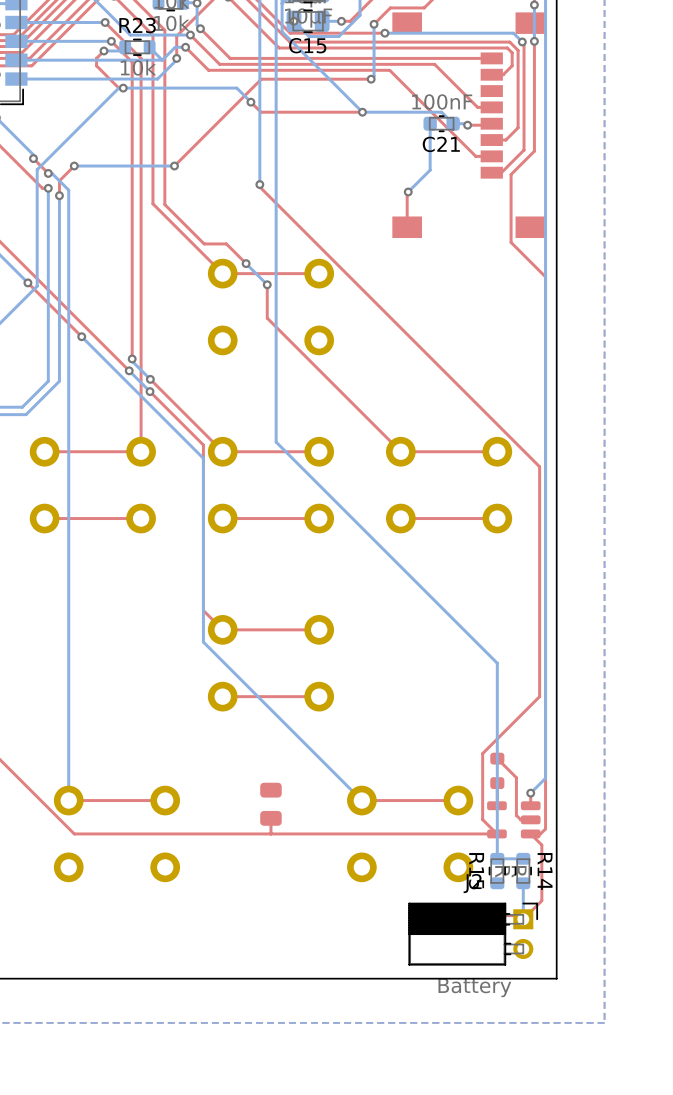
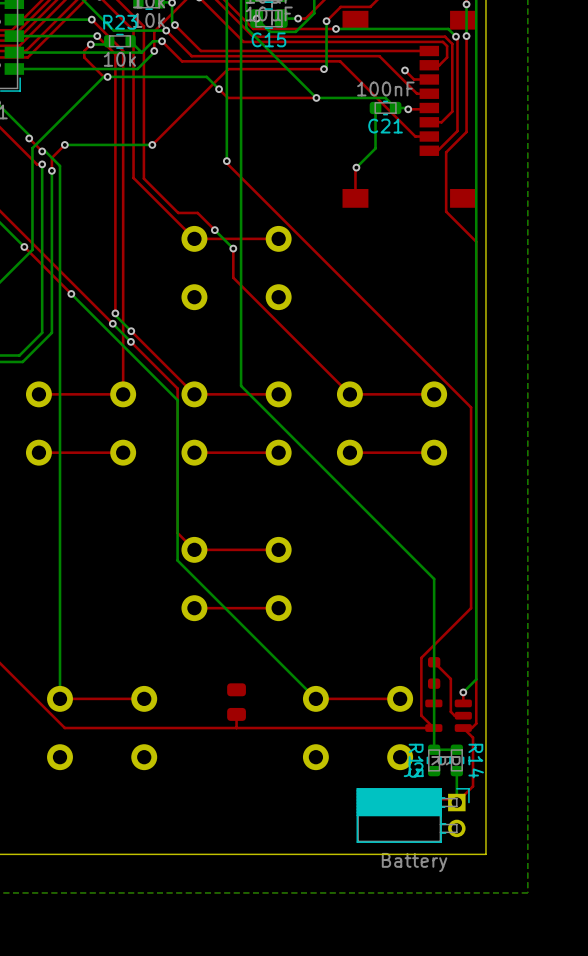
top track: none -> (405, 70) (414, 79) (429, 79)
via: none -> (405, 70)

